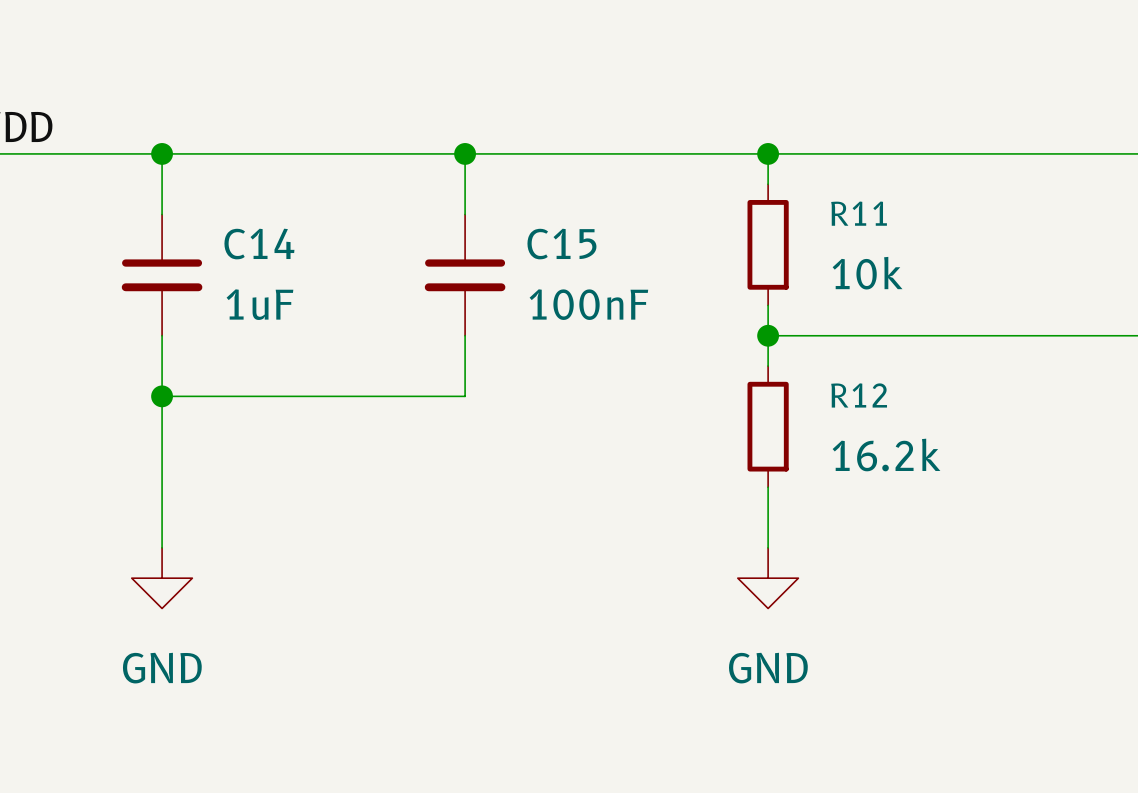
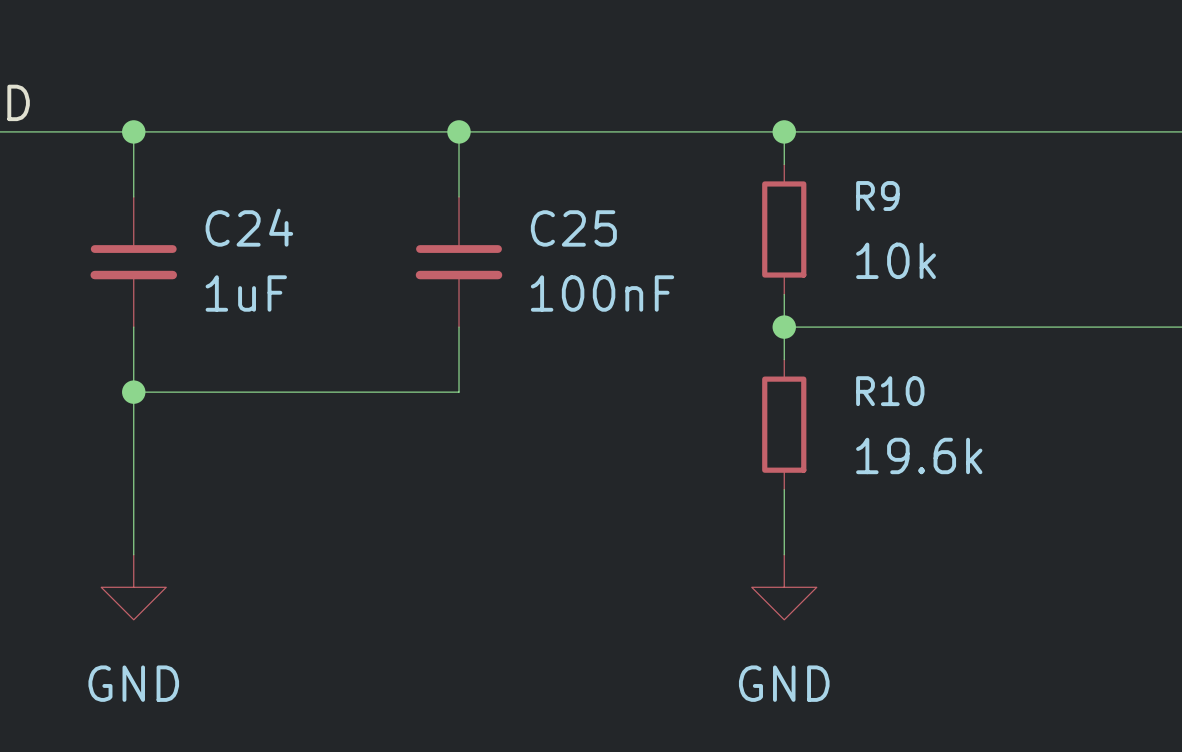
R11 name: R11 (859, 213) -> R9 (877, 196)
C14 name: C14 (259, 244) -> C24 (249, 227)
C15 name: C15 (561, 244) -> C25 (573, 228)
R12 name: R12 (859, 395) -> R10 (890, 391)
R12 value: 16.2k (886, 455) -> 19.6k (919, 455)

